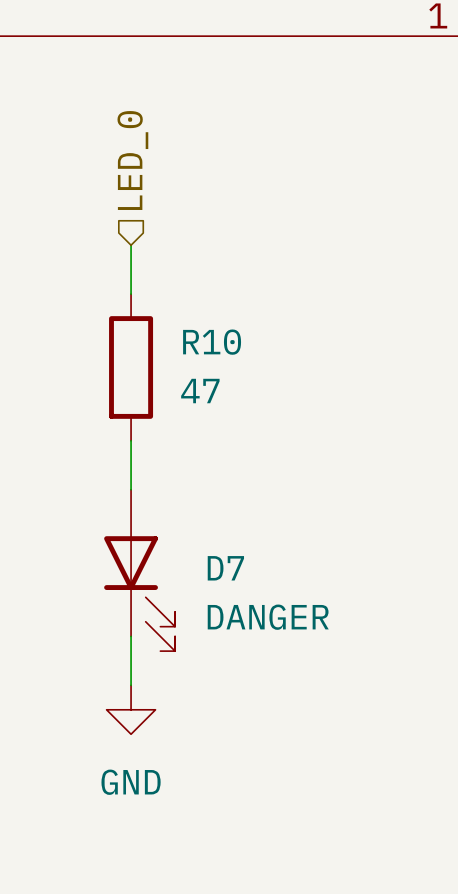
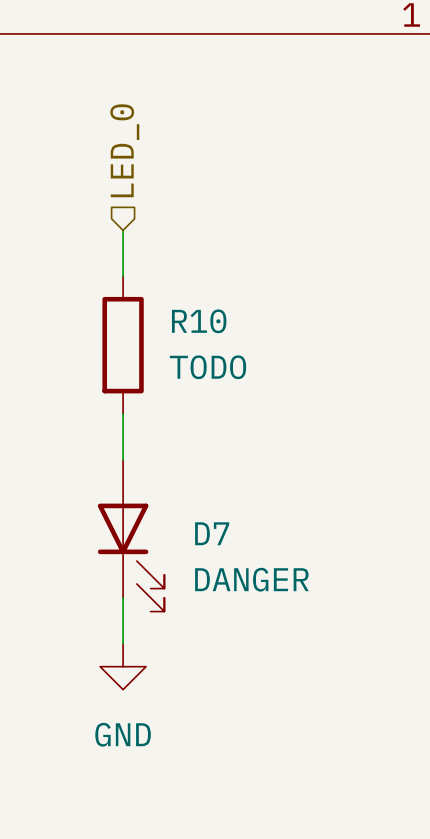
R10 value: 47 (200, 391) -> TODO (207, 367)

